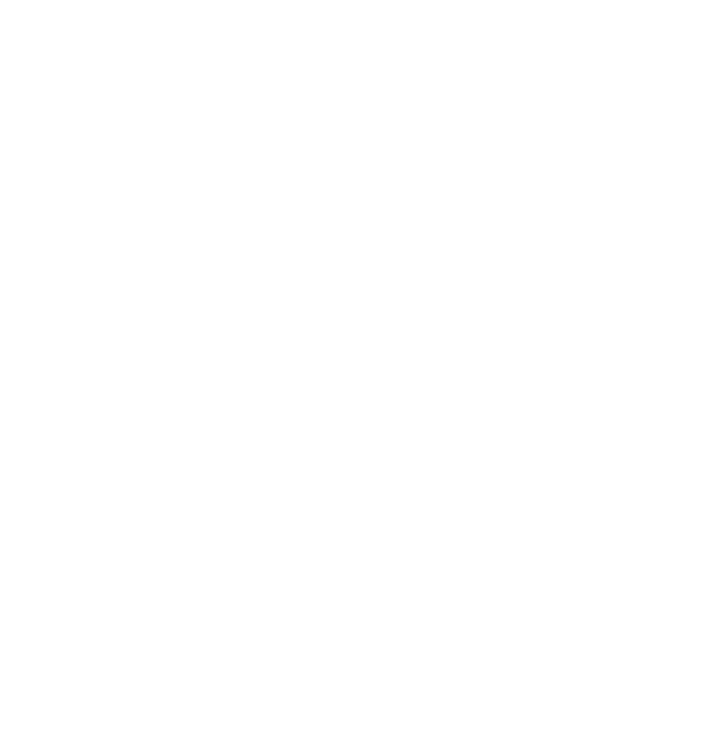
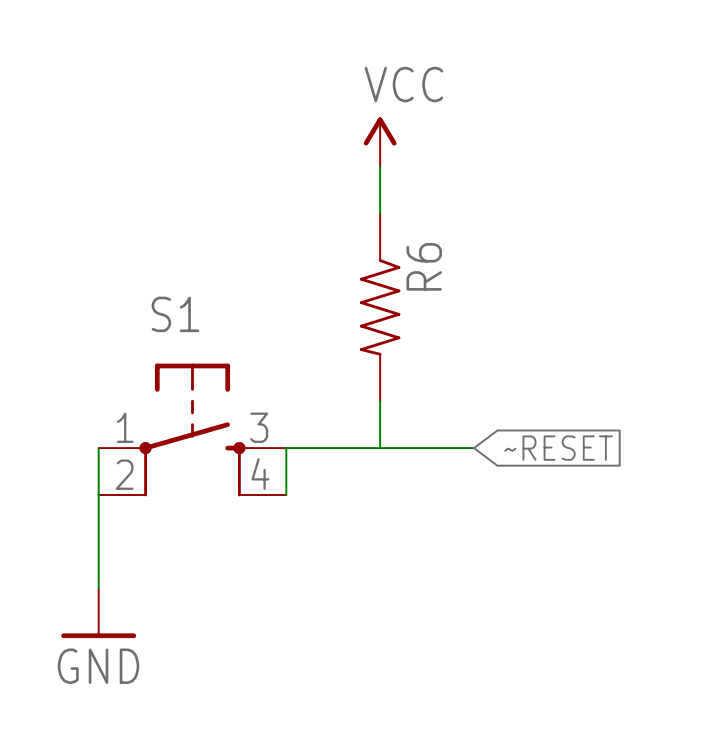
power symbol: none -> VCC (380, 141)
wire: none -> (380, 166) (380, 213)
R6: none -> (380, 307)
wire: none -> (380, 401) (380, 448)
S1: none -> (192, 430)
wire: none -> (98, 448) (98, 588)
wire: none -> (473, 448) (286, 448) (286, 494)
global label: none -> ~RESET (558, 448)
power symbol: none -> GND (98, 613)

